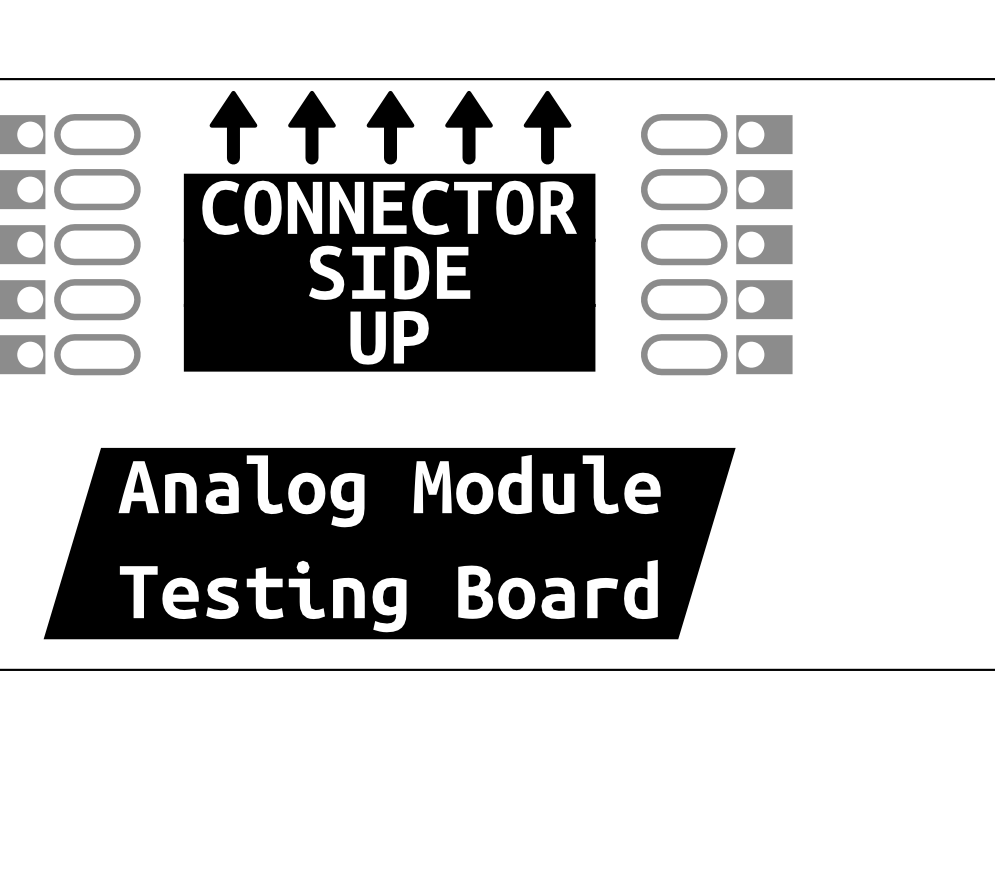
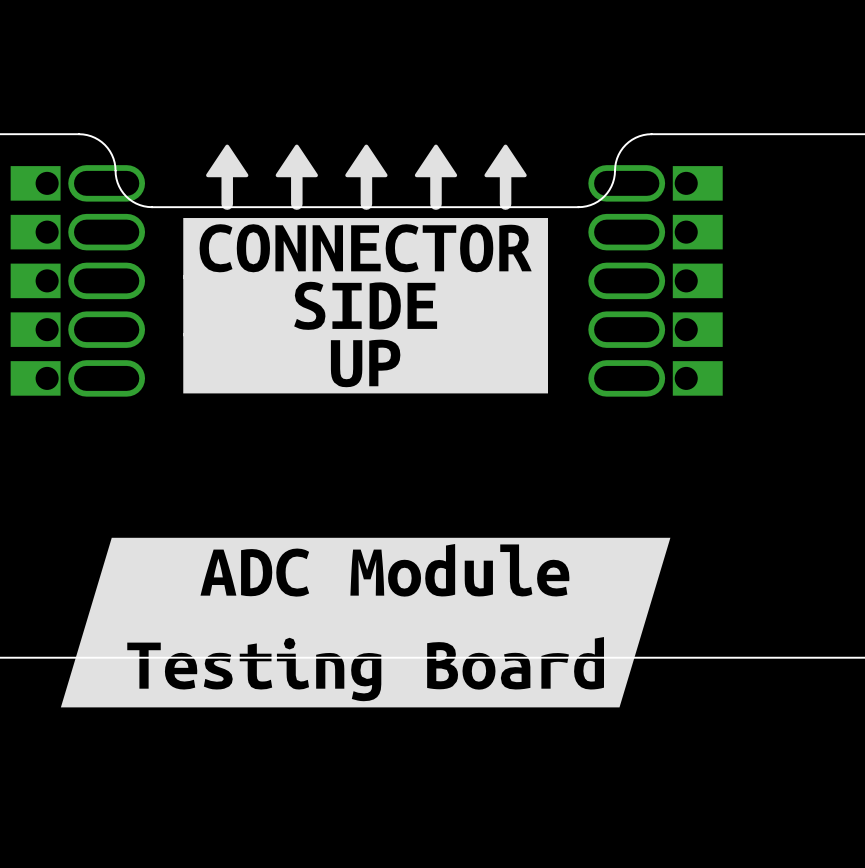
board edge: (66, 79) (712, 79) -> (79, 134) (91, 136) (104, 144) (113, 158) (116, 178) (123, 193) (136, 203) (152, 207) (582, 206) (597, 201) (609, 190) (614, 178) (617, 158) (625, 144) (635, 137) (651, 134)
drawing: [43, 447, 736, 640] -> none
drawing: none -> [60, 537, 671, 708]

